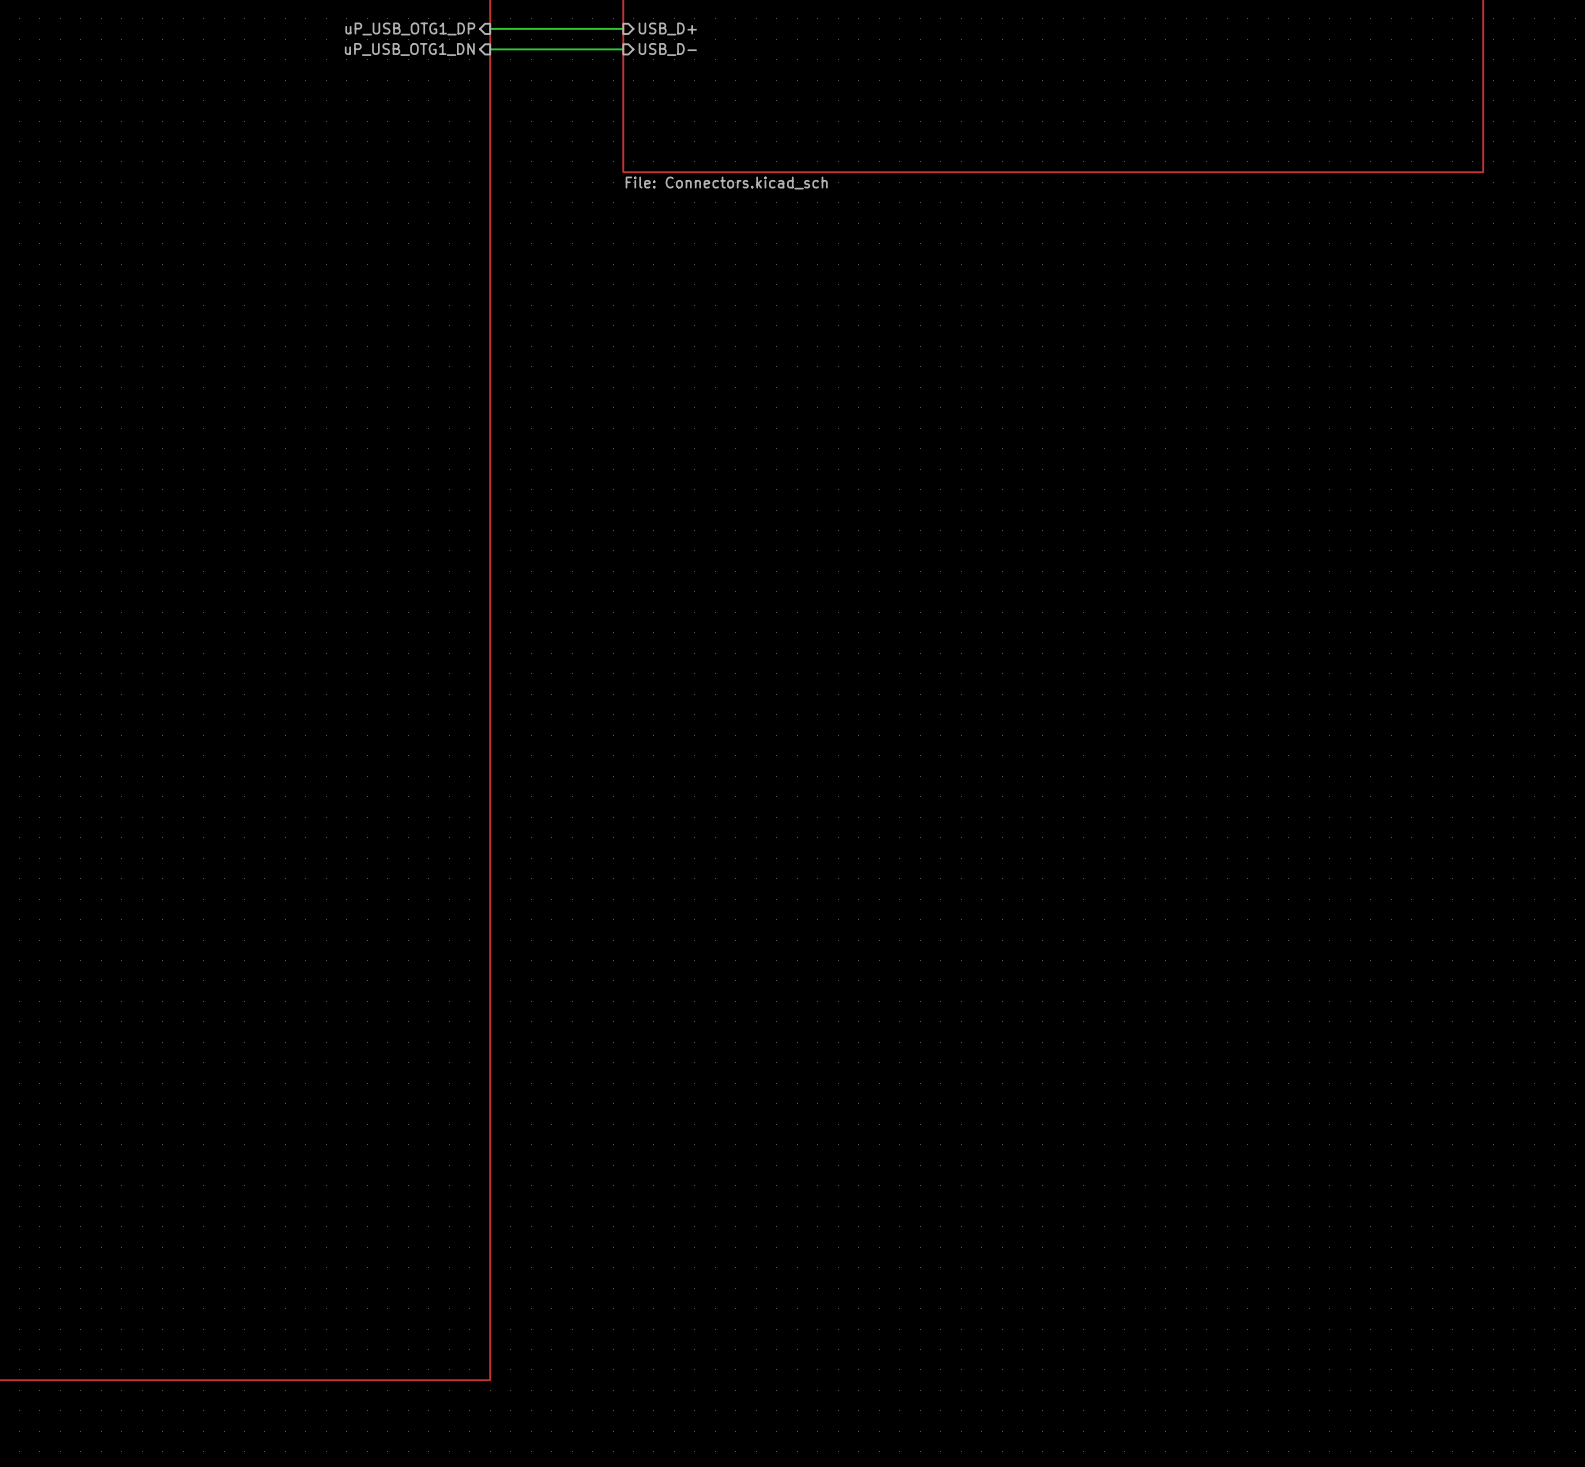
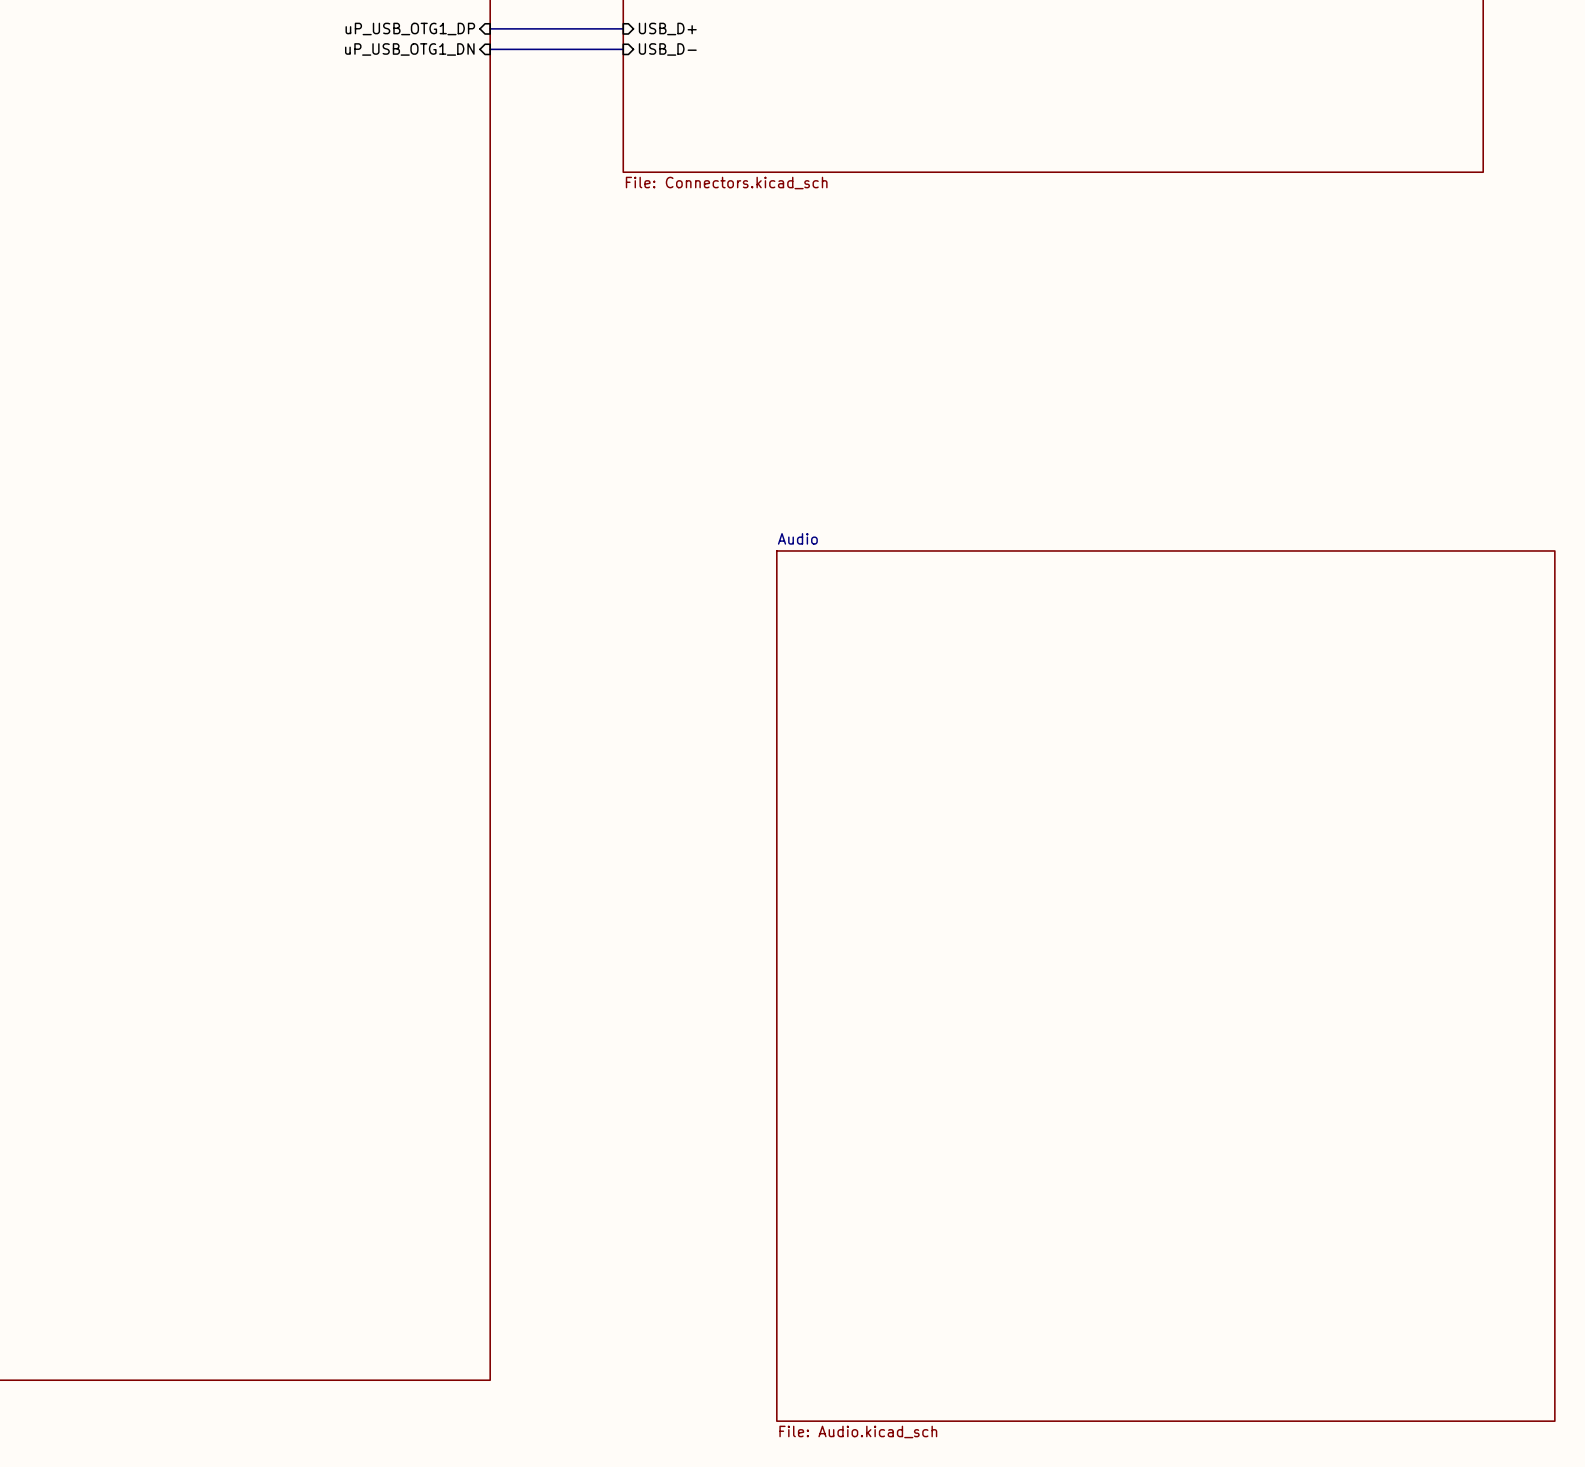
sheet Audio: none -> File: Audio.kicad_sch (1165, 986)

